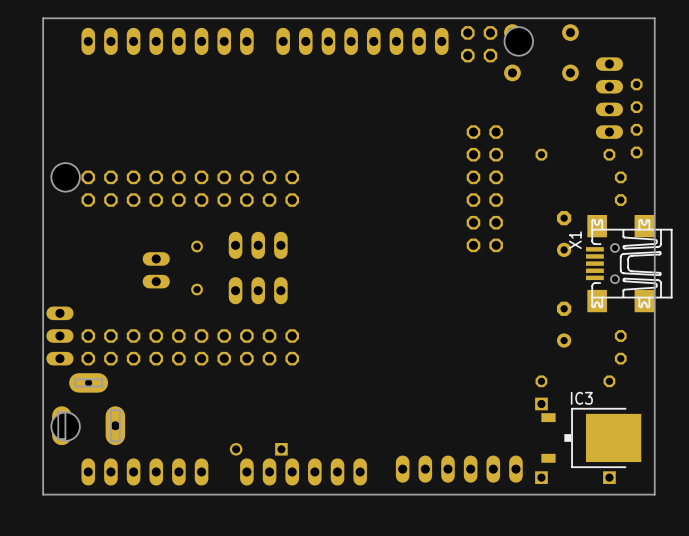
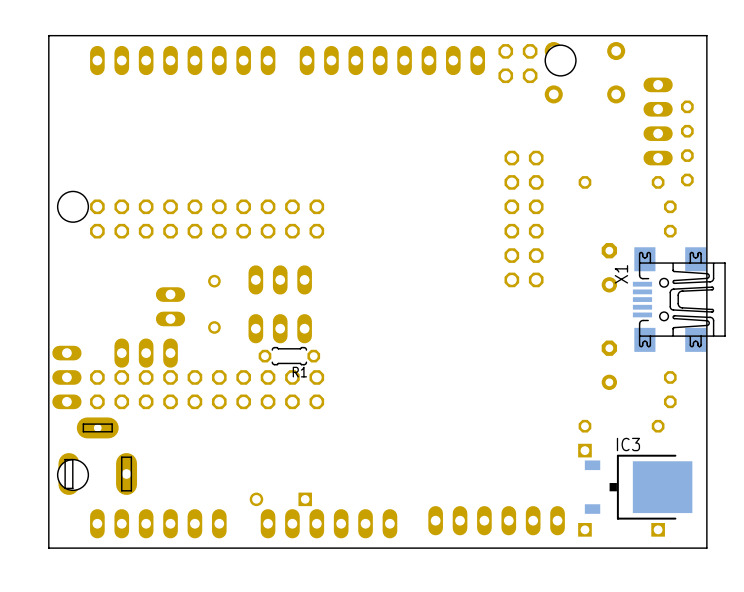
part: none -> (146, 353)
R1: none -> (289, 356)

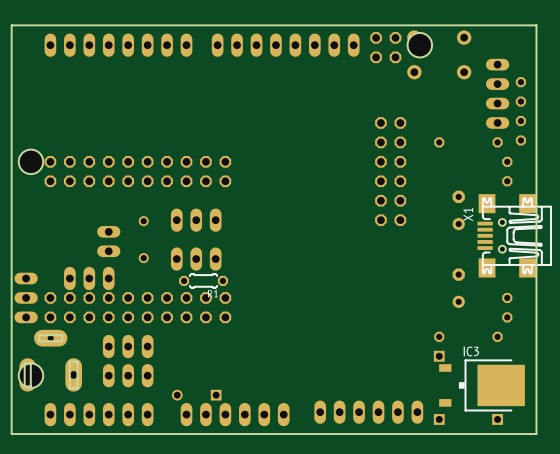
part: none -> (128, 346)
part: none -> (128, 375)

